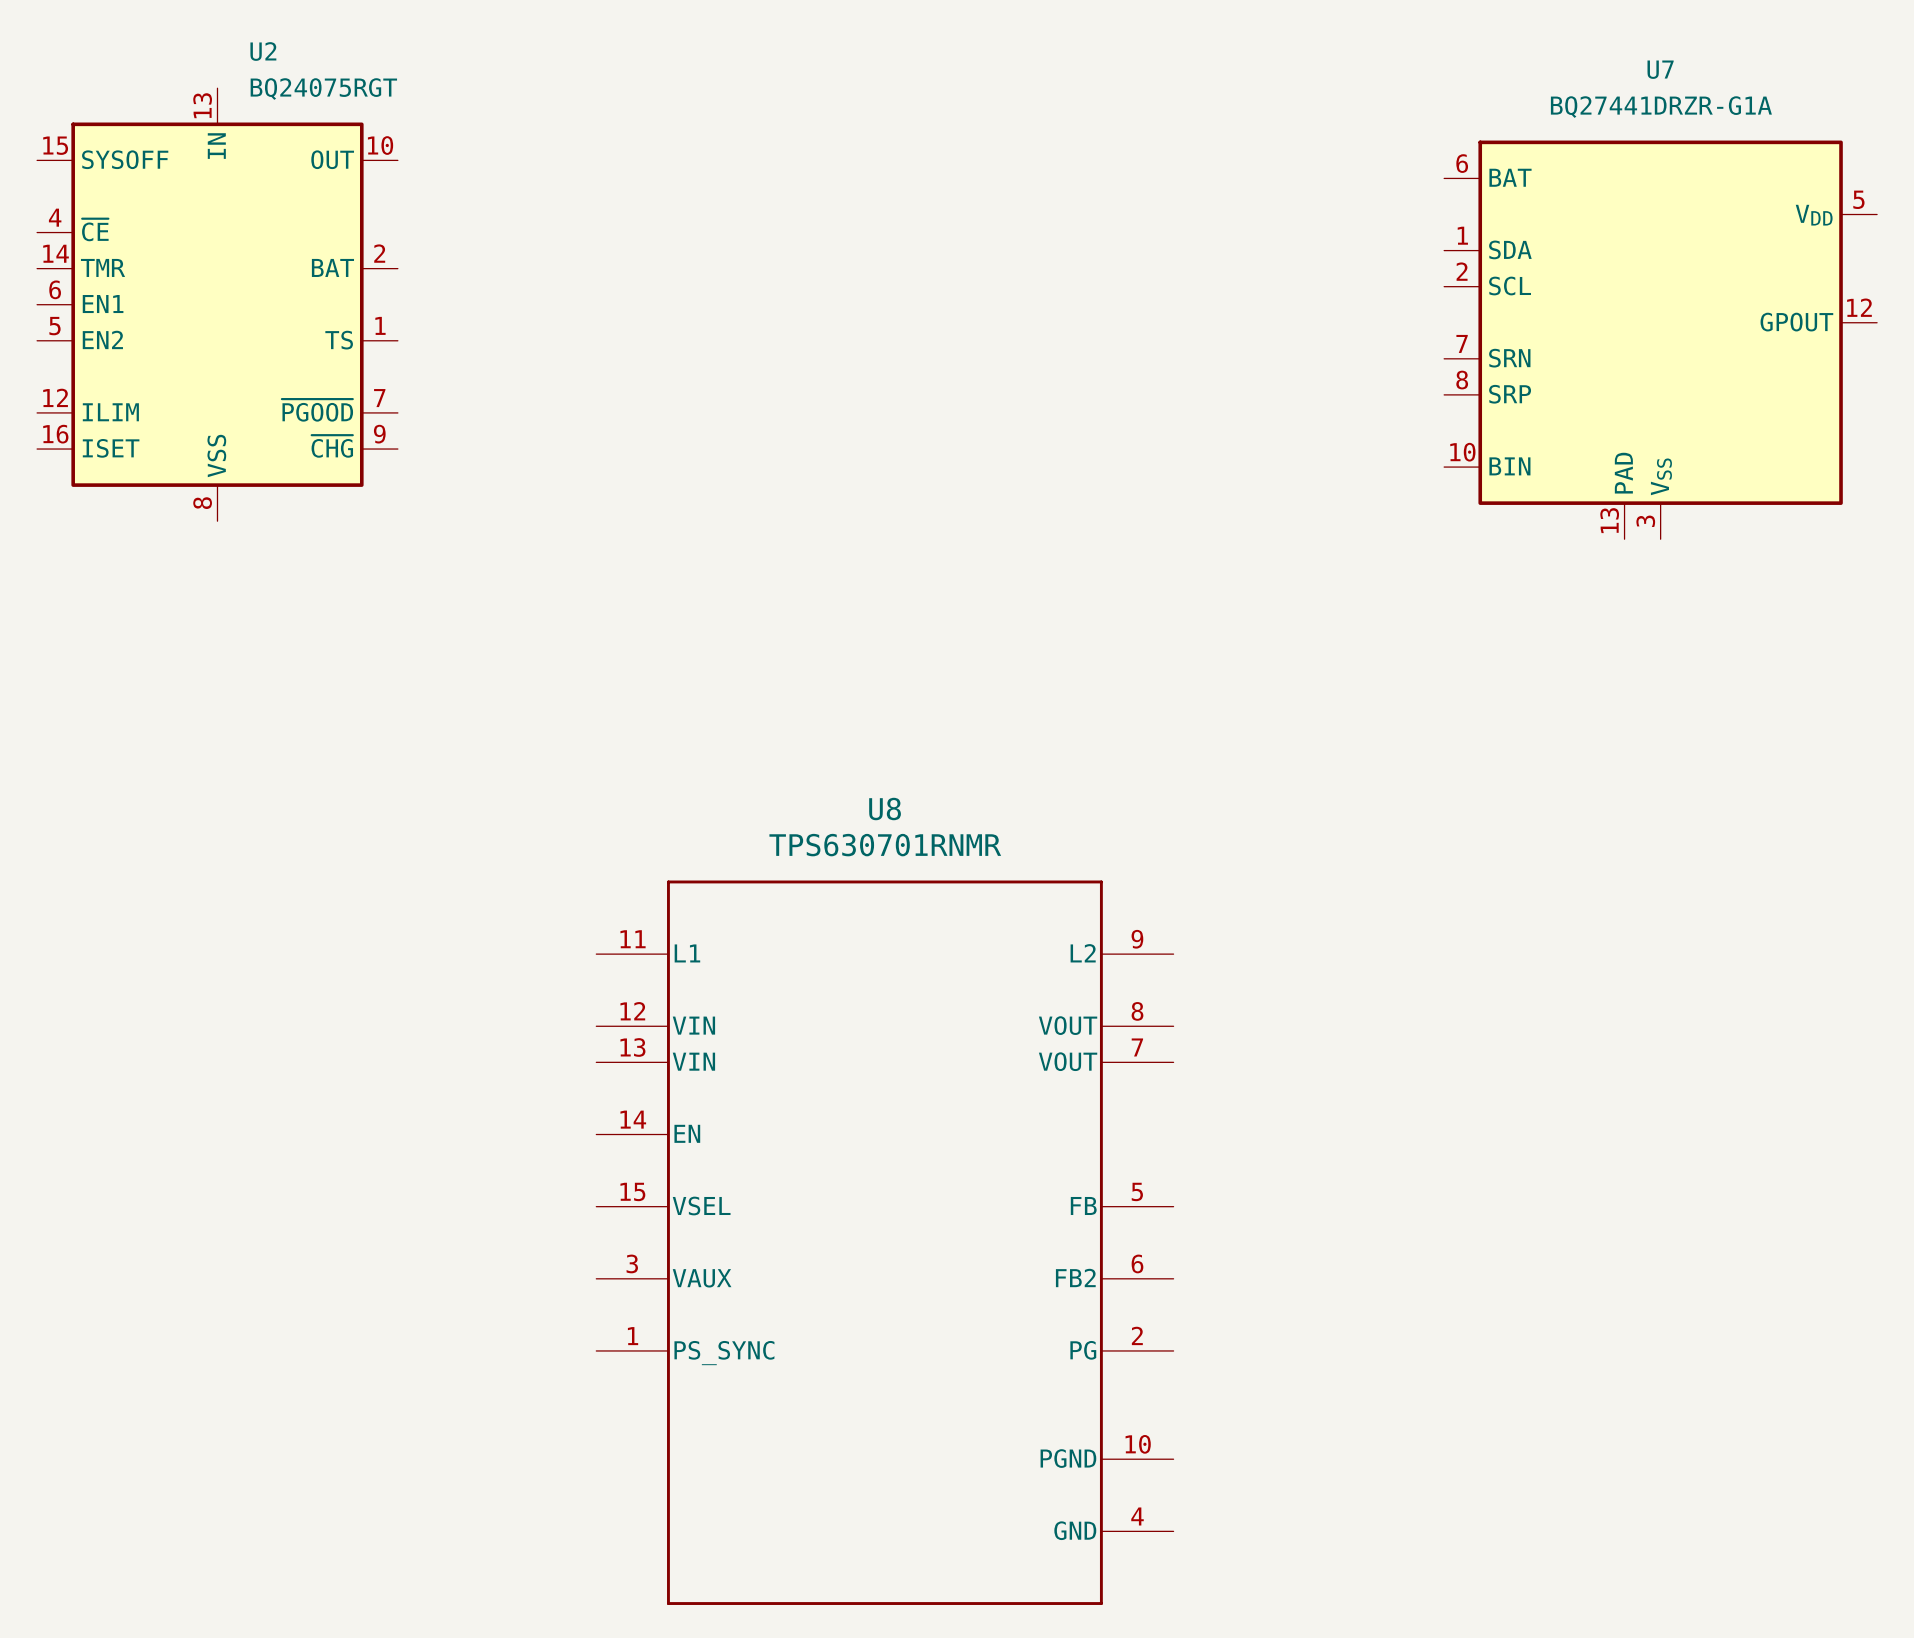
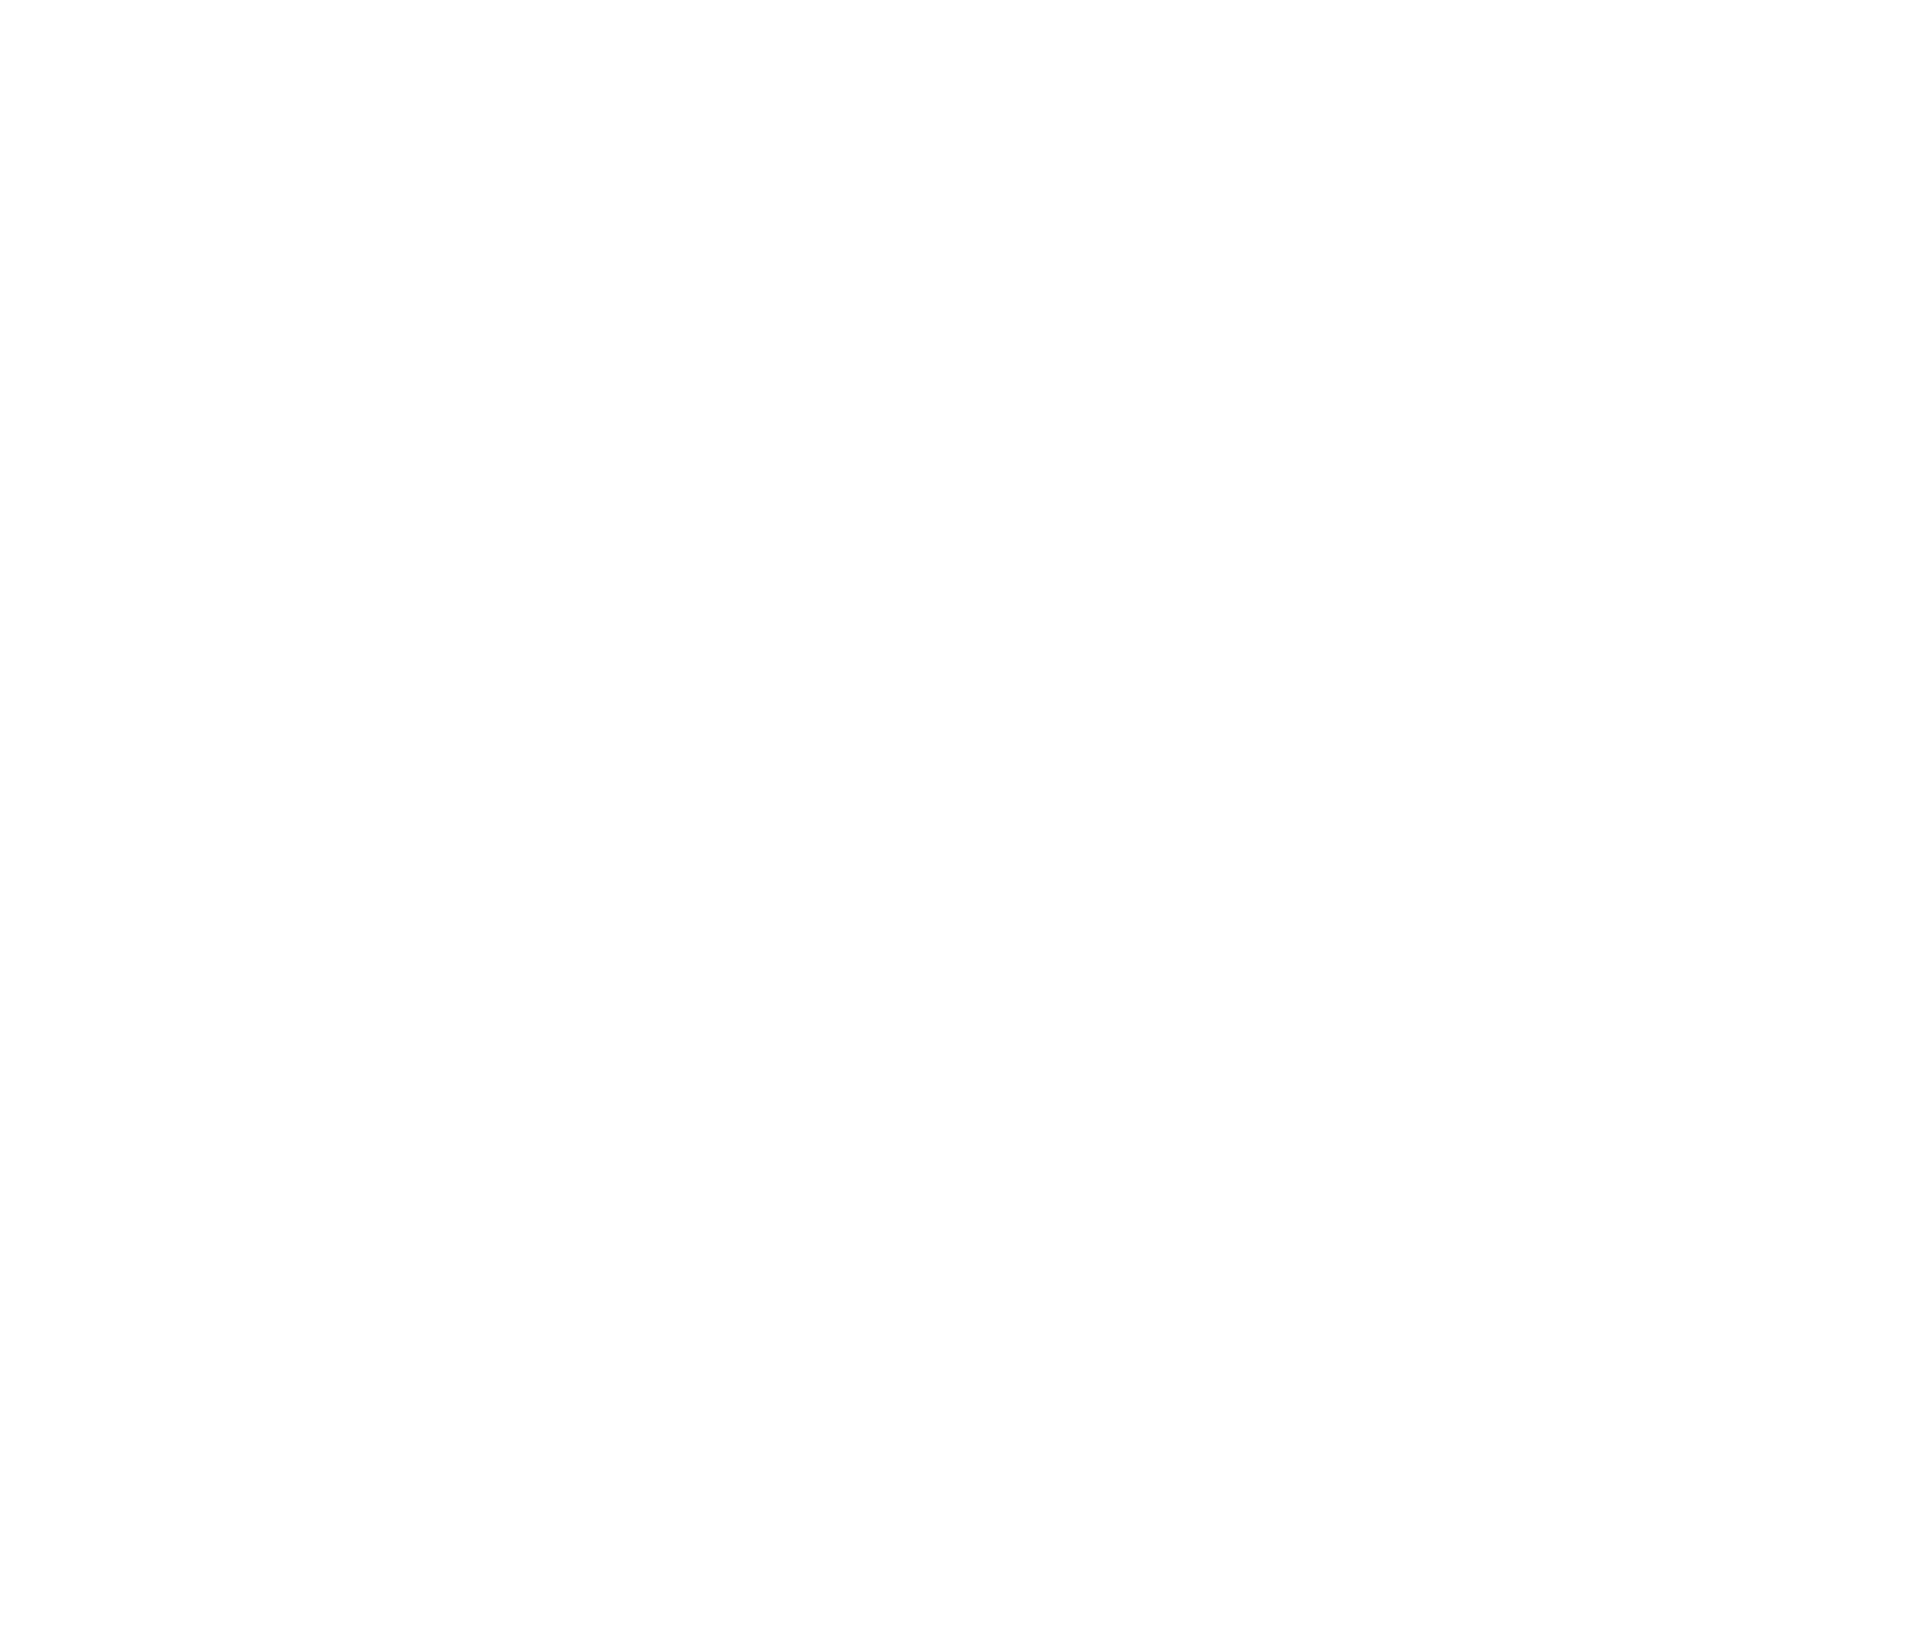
U2: BQ24075RGT (217, 304) -> none
U7: BQ27441DRZR-G1A (1660, 339) -> none
U8: TPS630701RNMR (884, 1242) -> none

